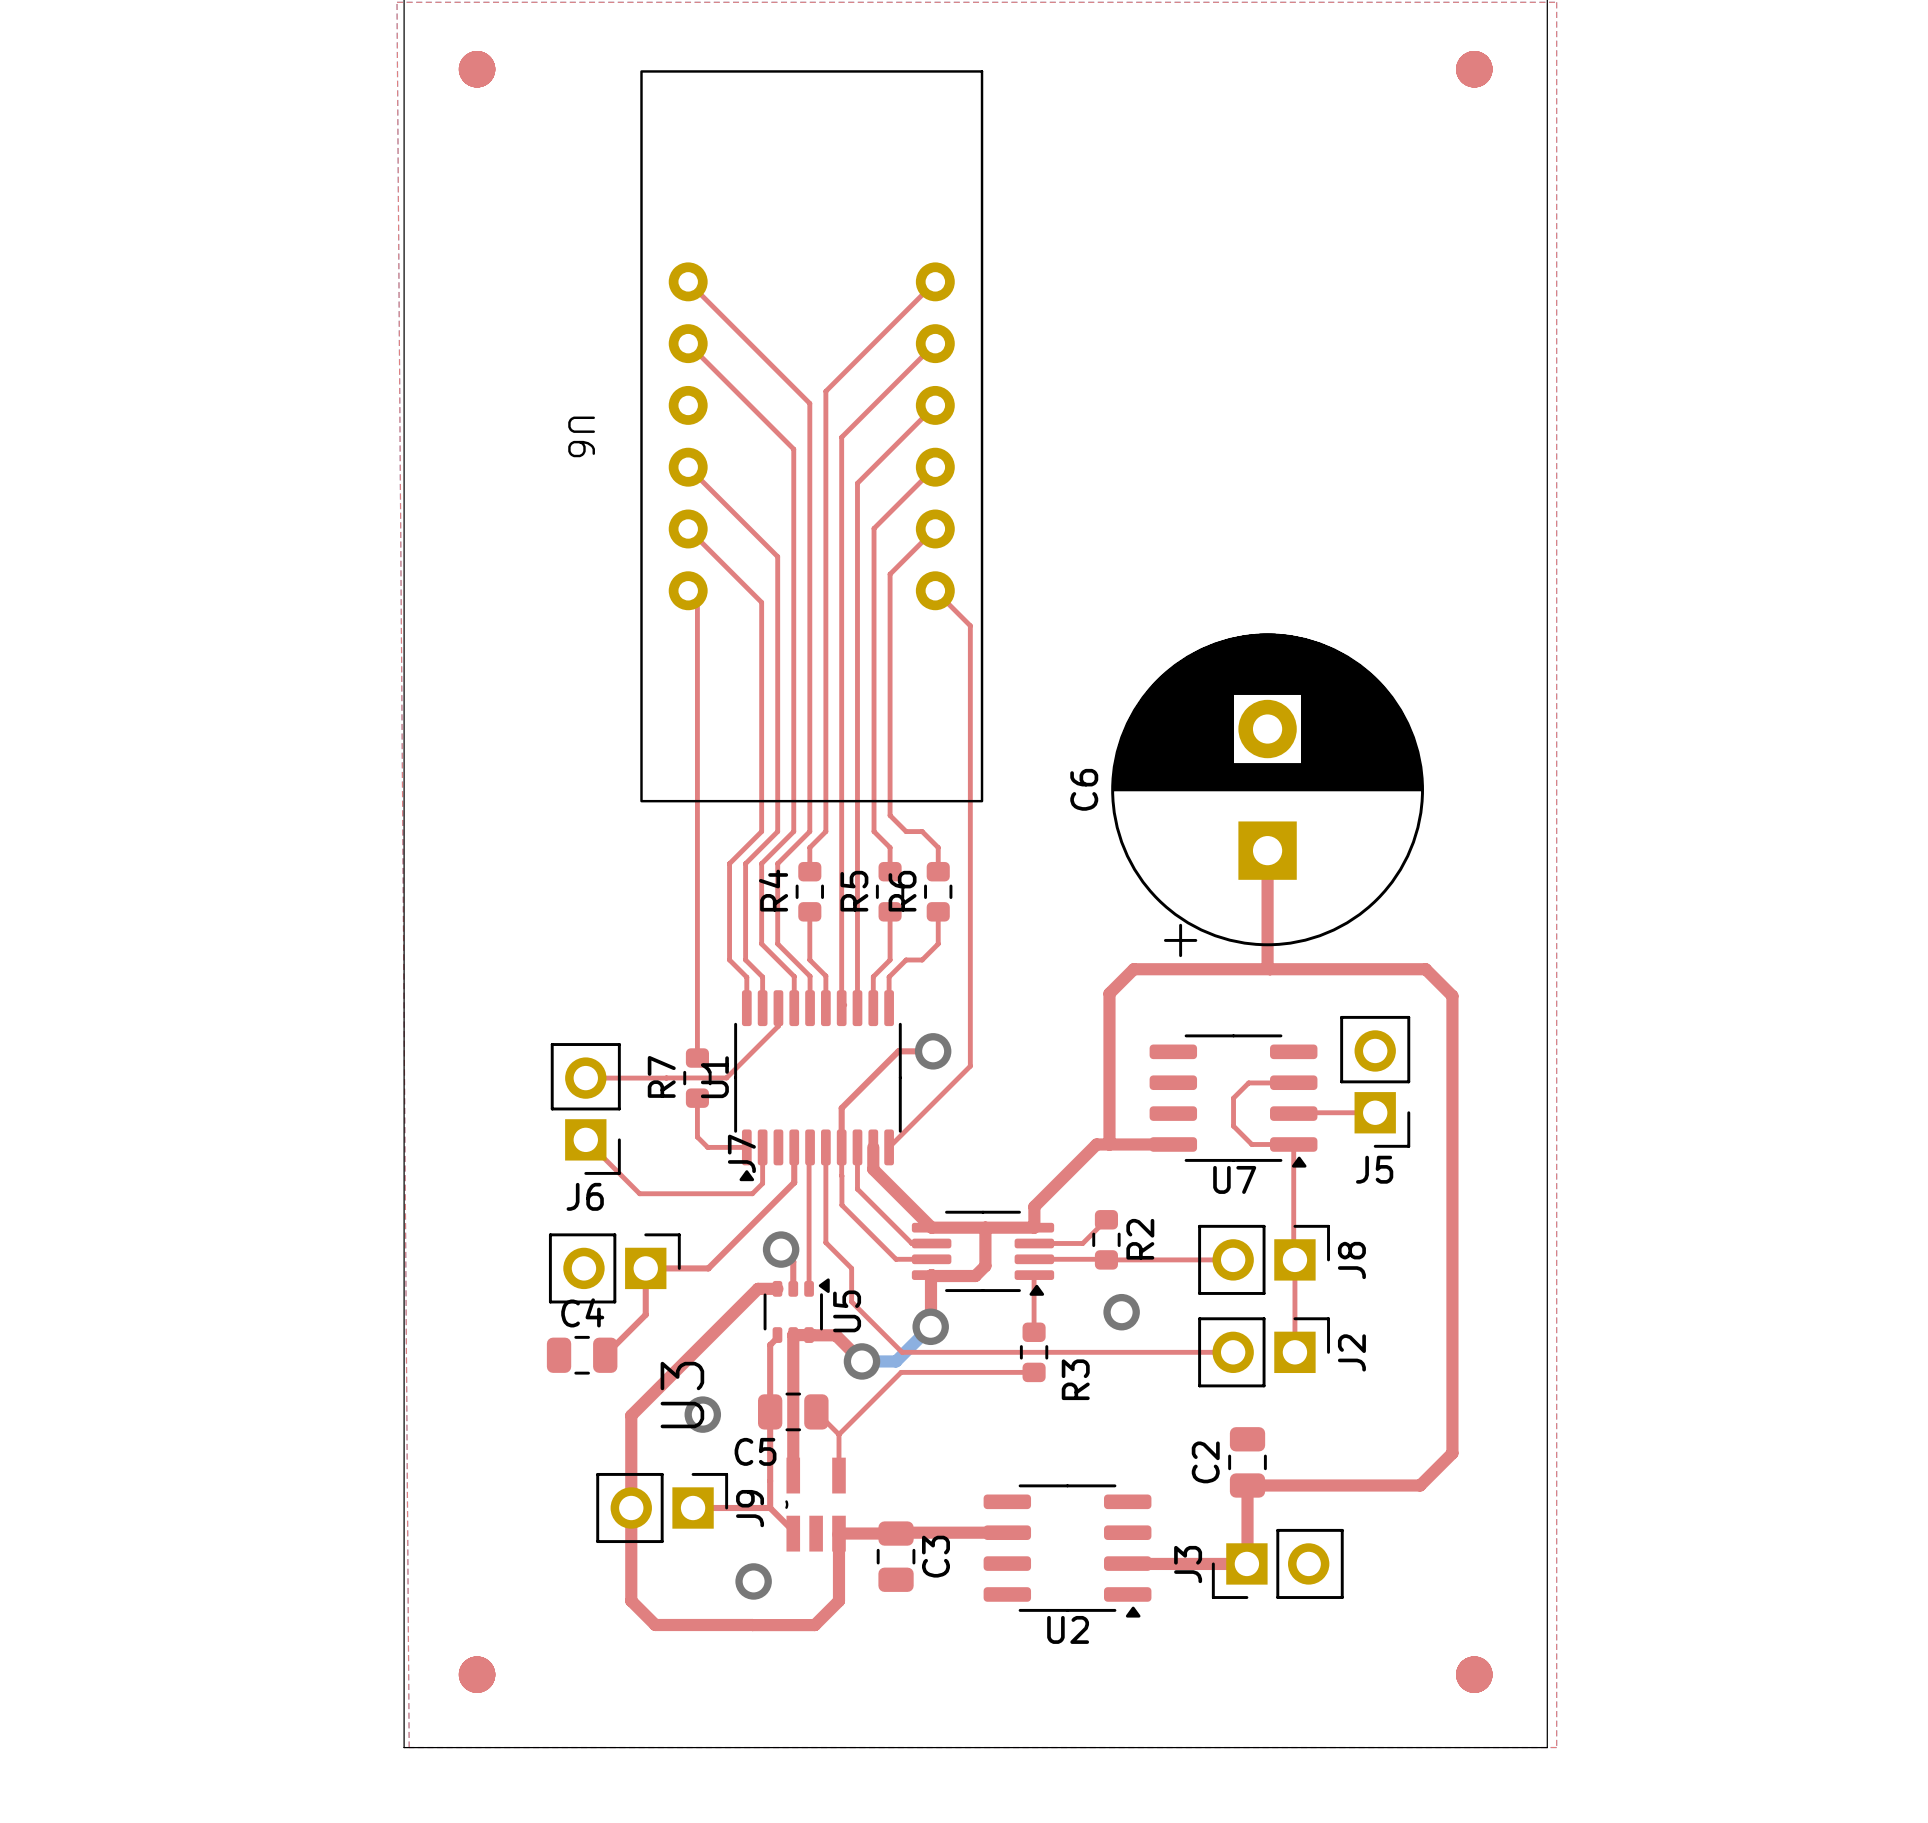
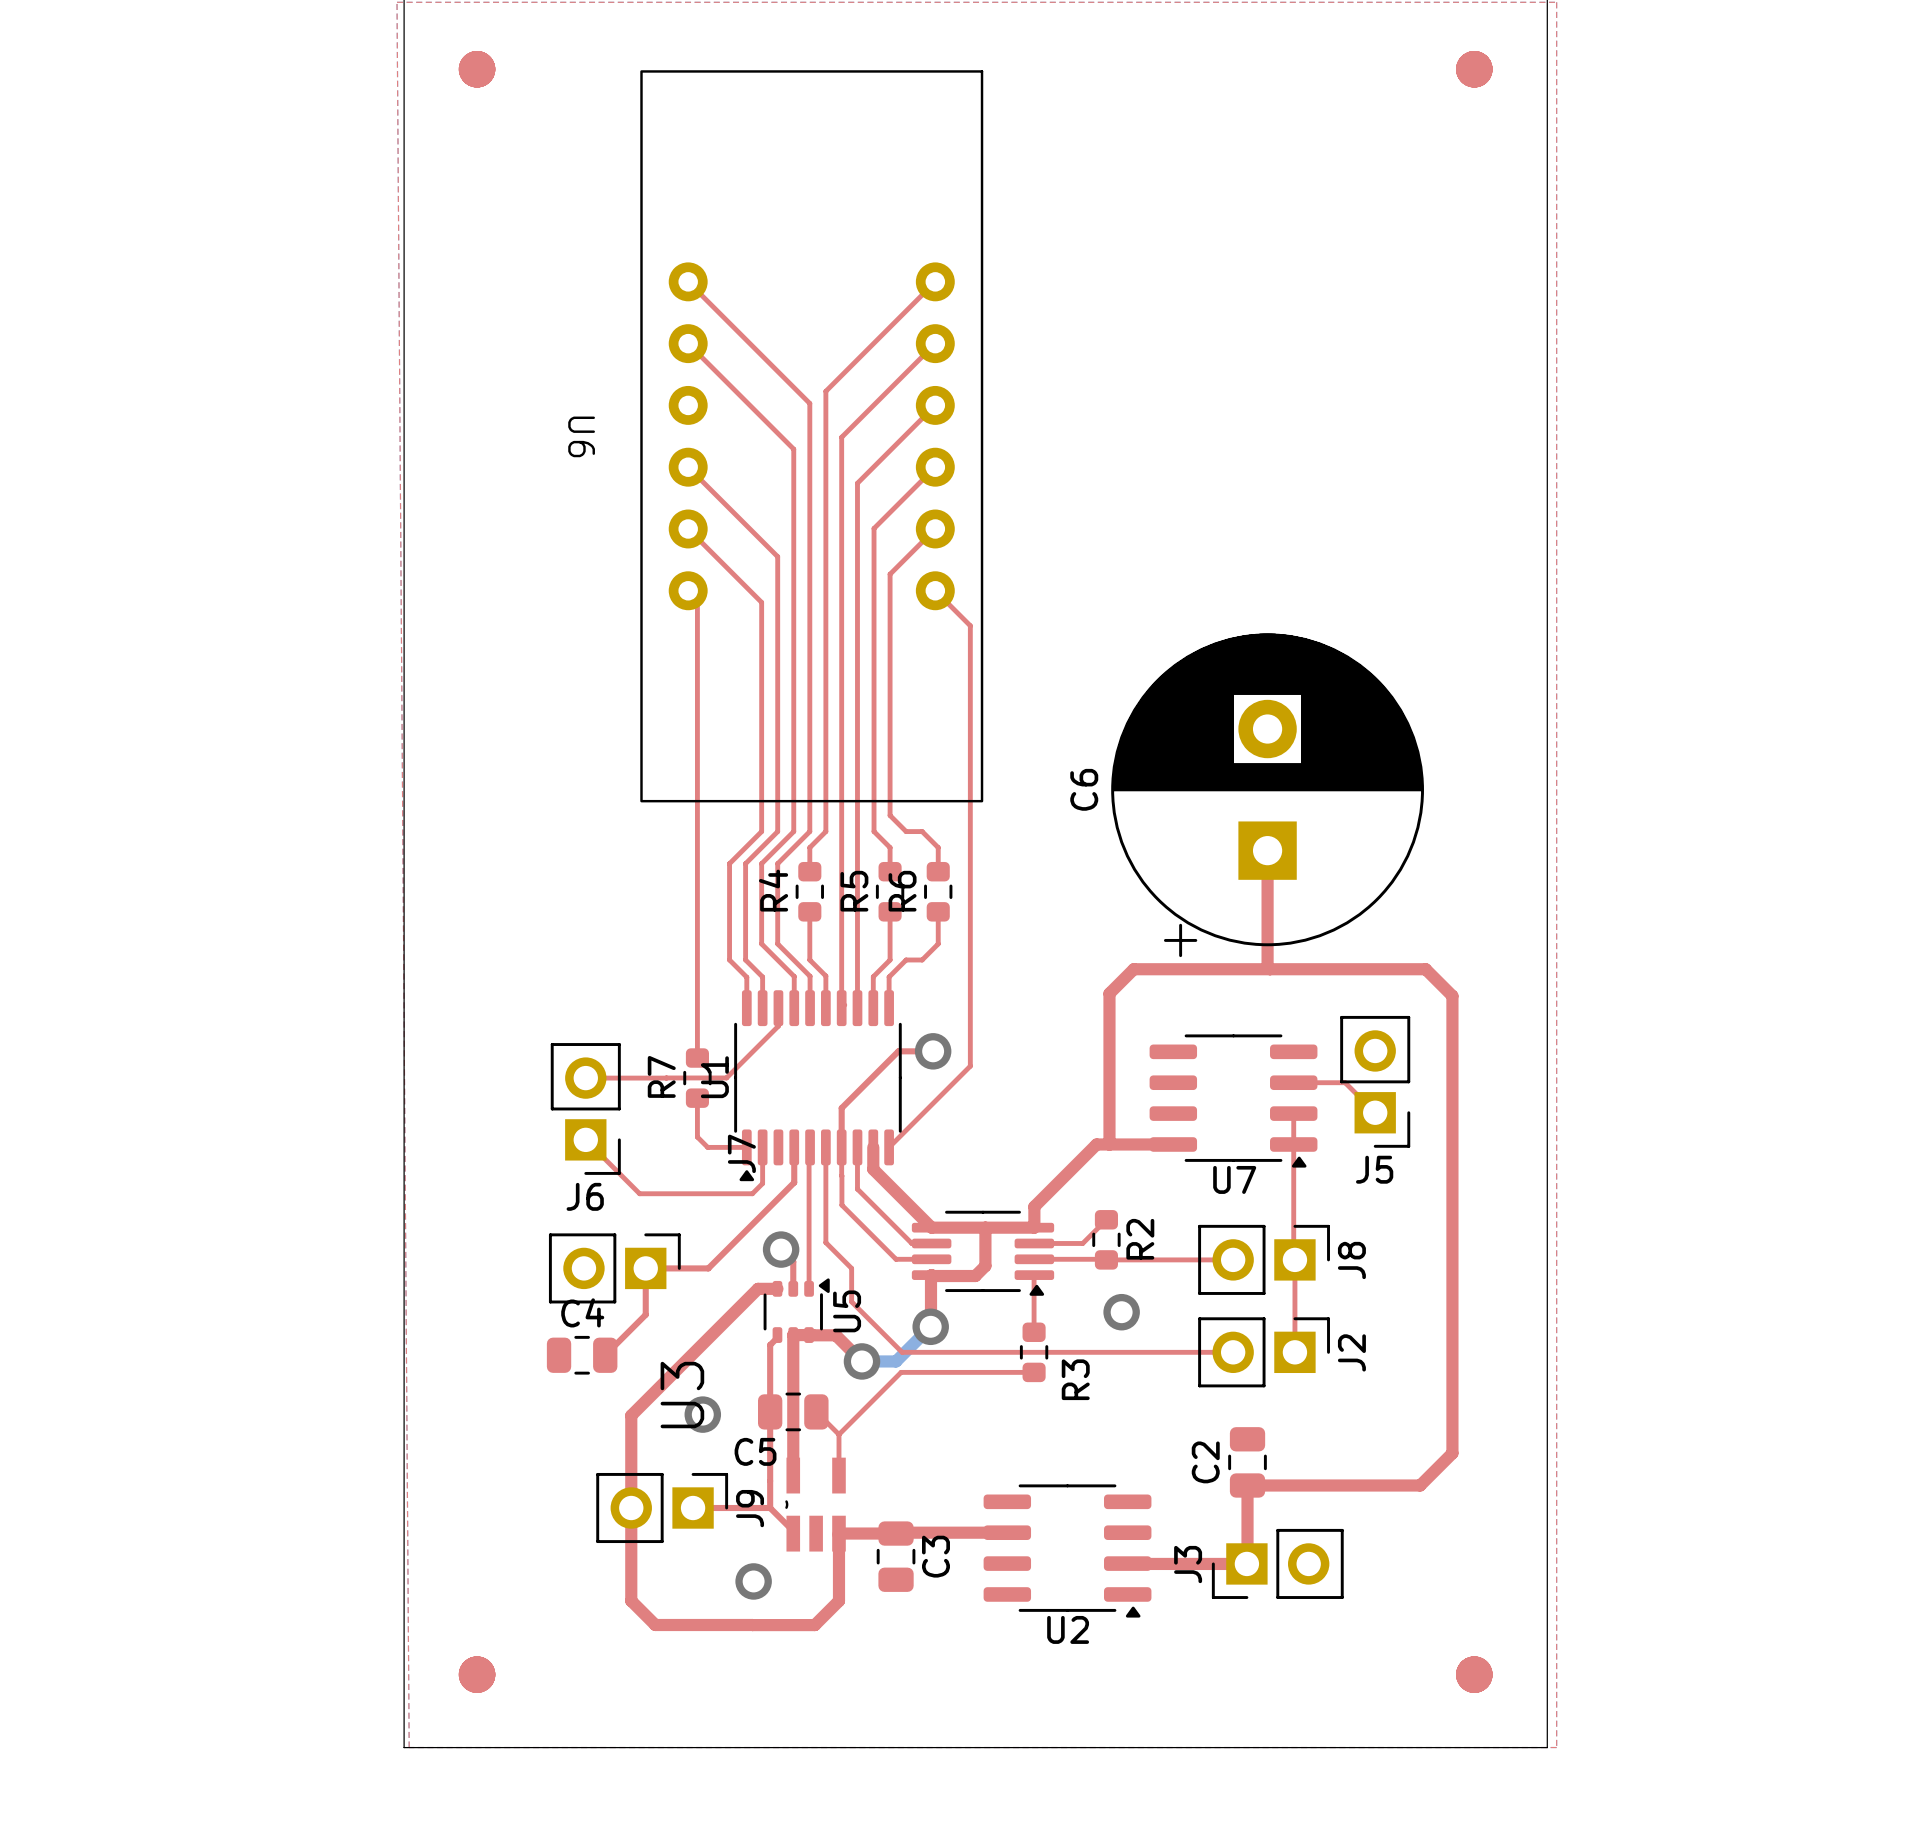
top track: (1293, 1082) (1248, 1082) (1233, 1098) (1233, 1126) (1251, 1144) (1293, 1144) -> (1293, 1113) (1293, 1144)
top track: (1294, 1112) (1375, 1112) -> (1293, 1082) (1345, 1082) (1375, 1112)

